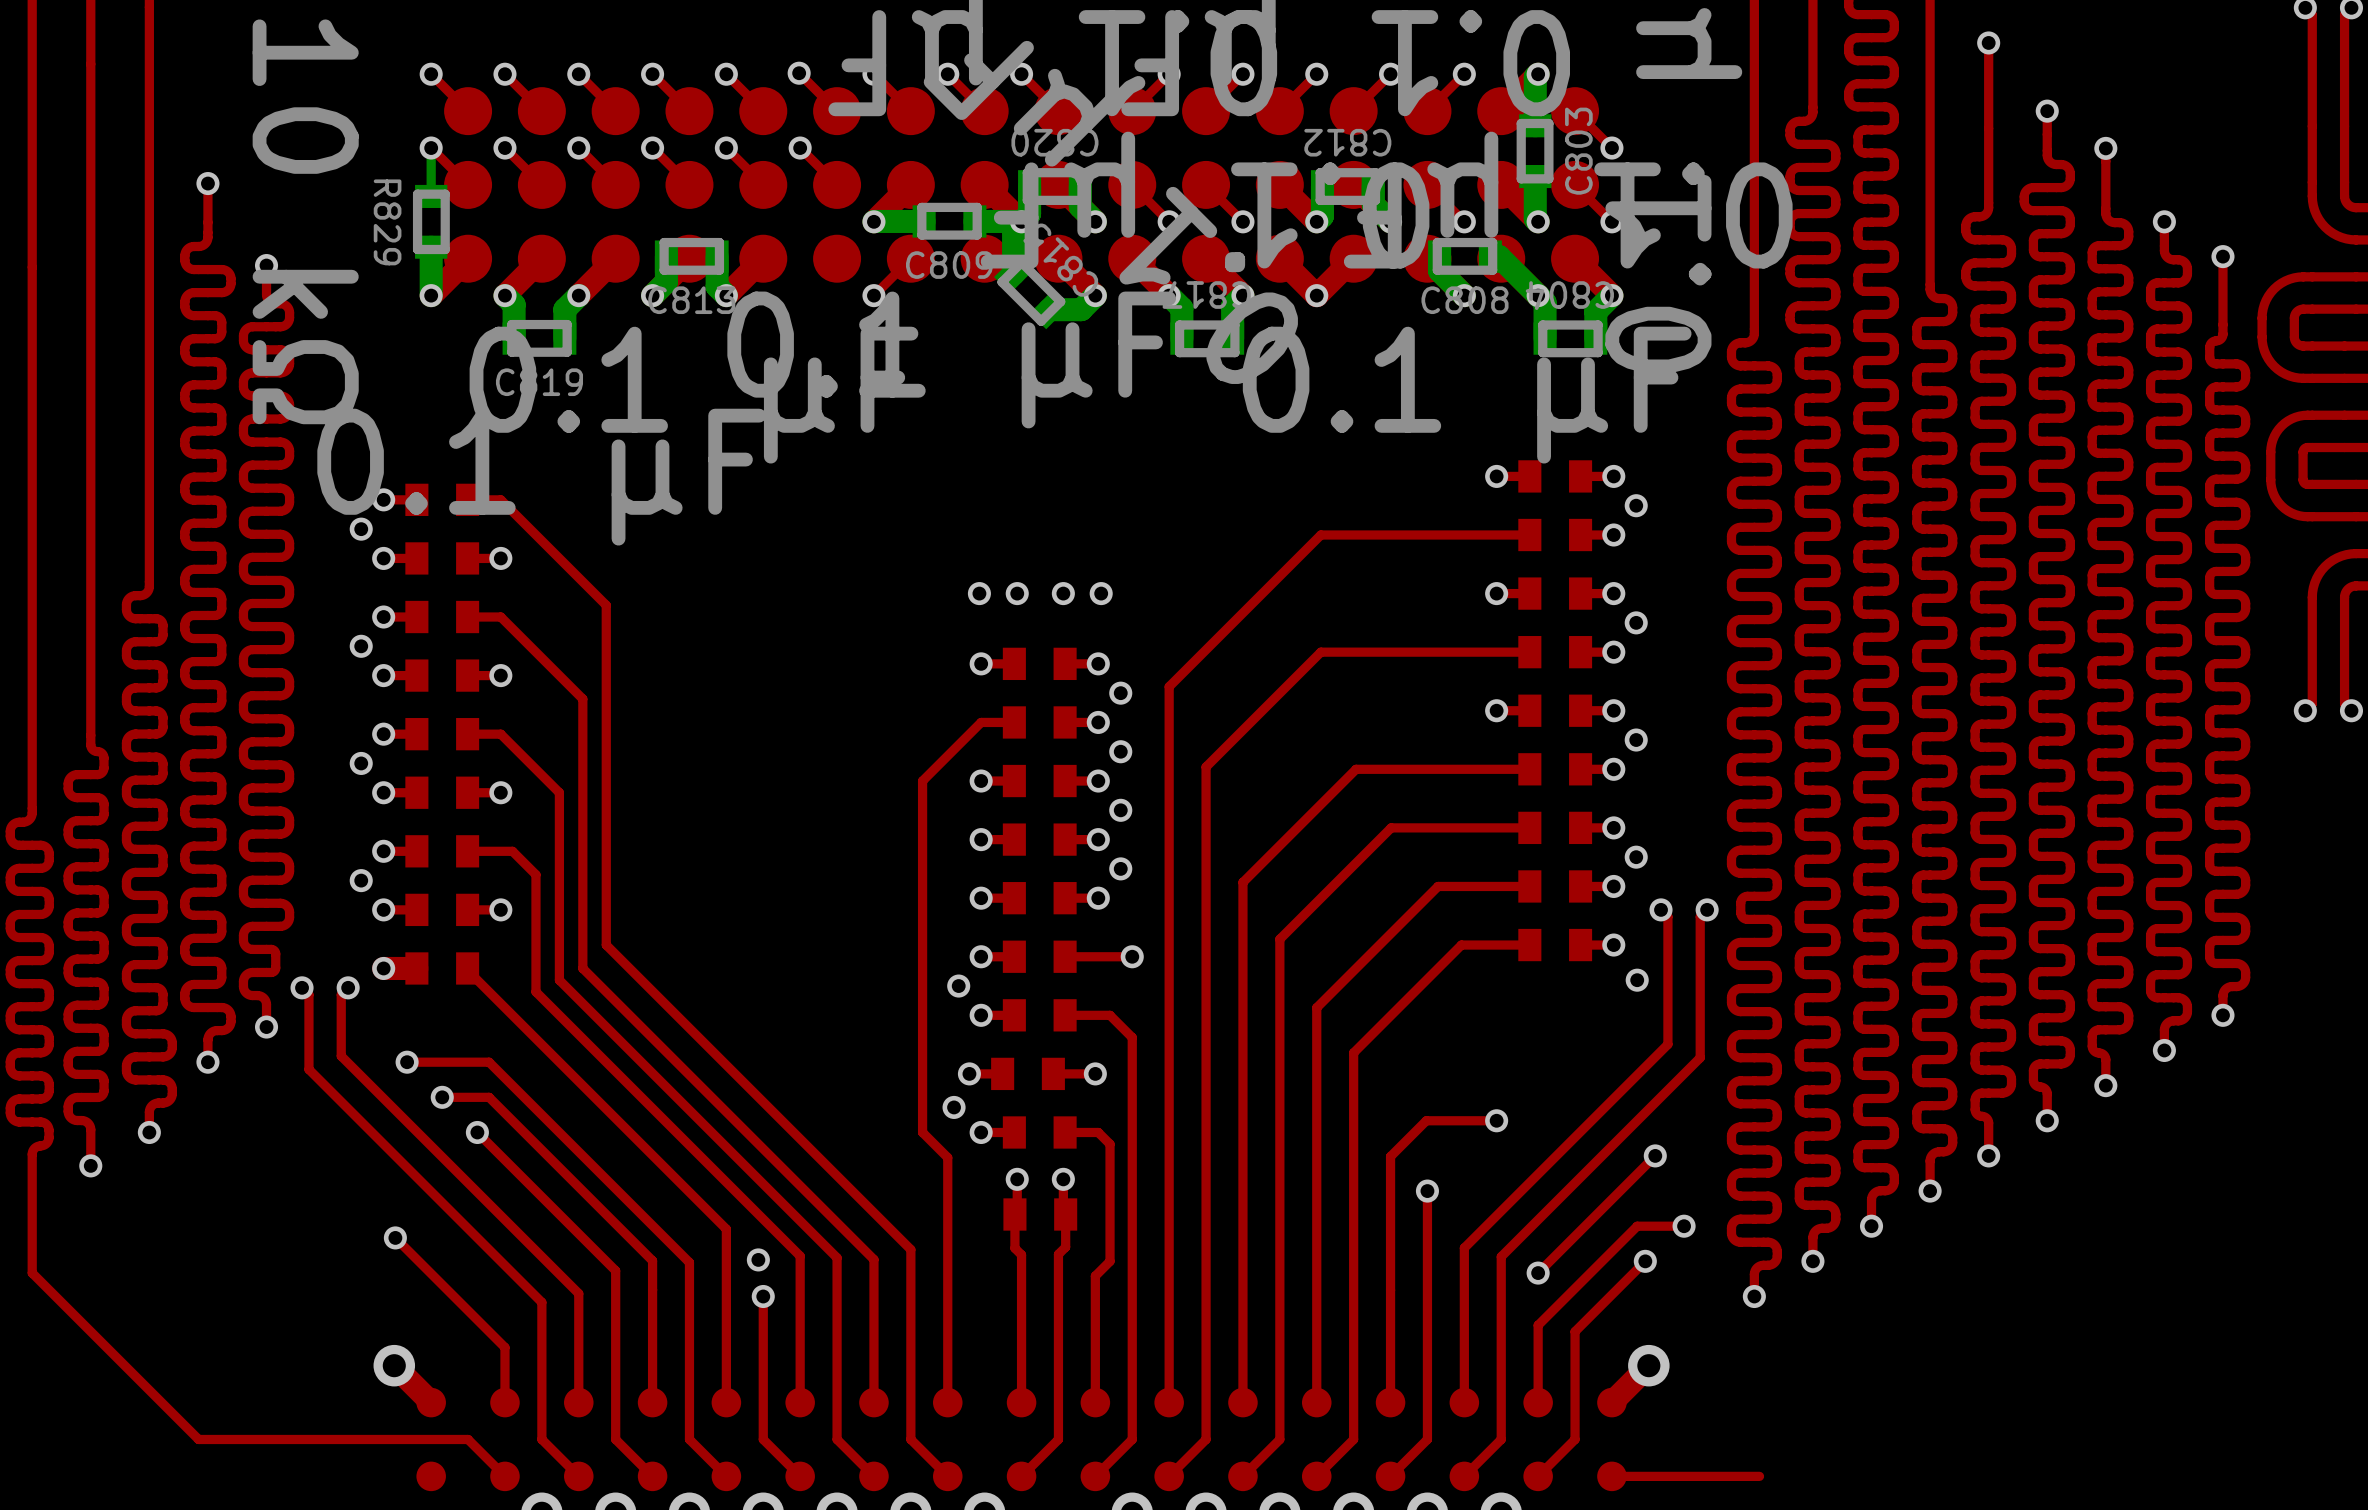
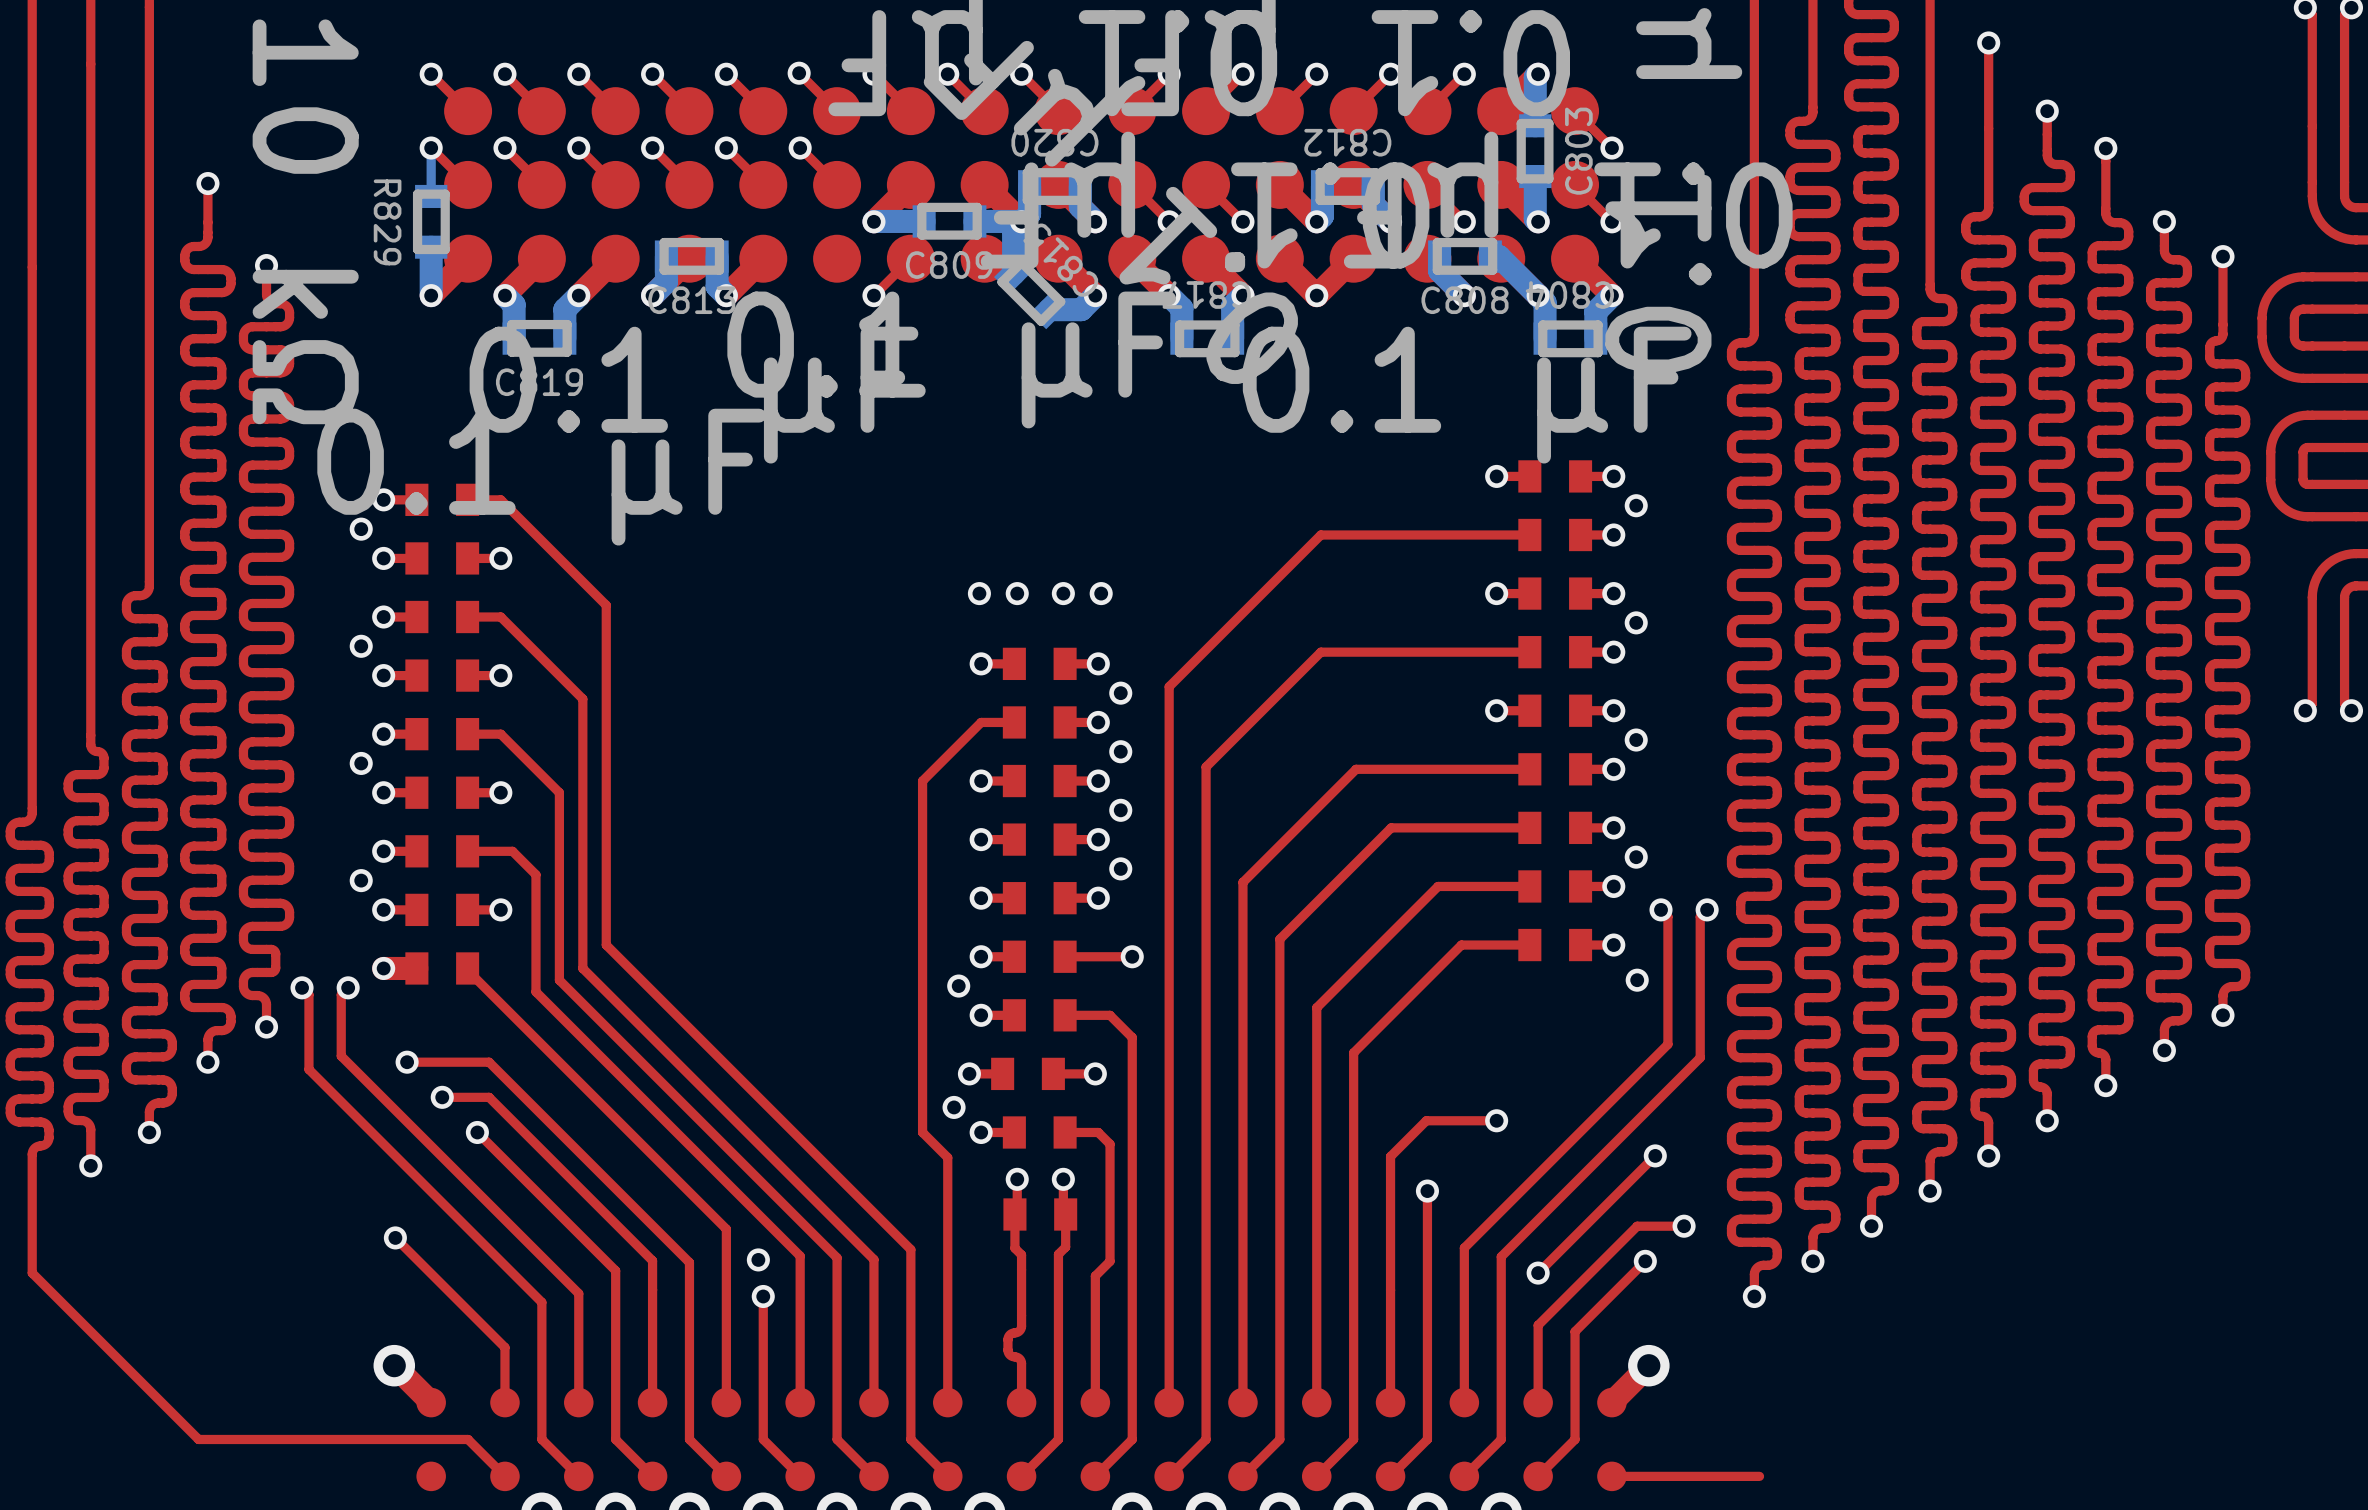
top track: (1021, 1326) (1021, 1363) -> (1021, 1326) (1019, 1330) (1010, 1334) (1007, 1339) (1009, 1353) (1019, 1358) (1021, 1363)

